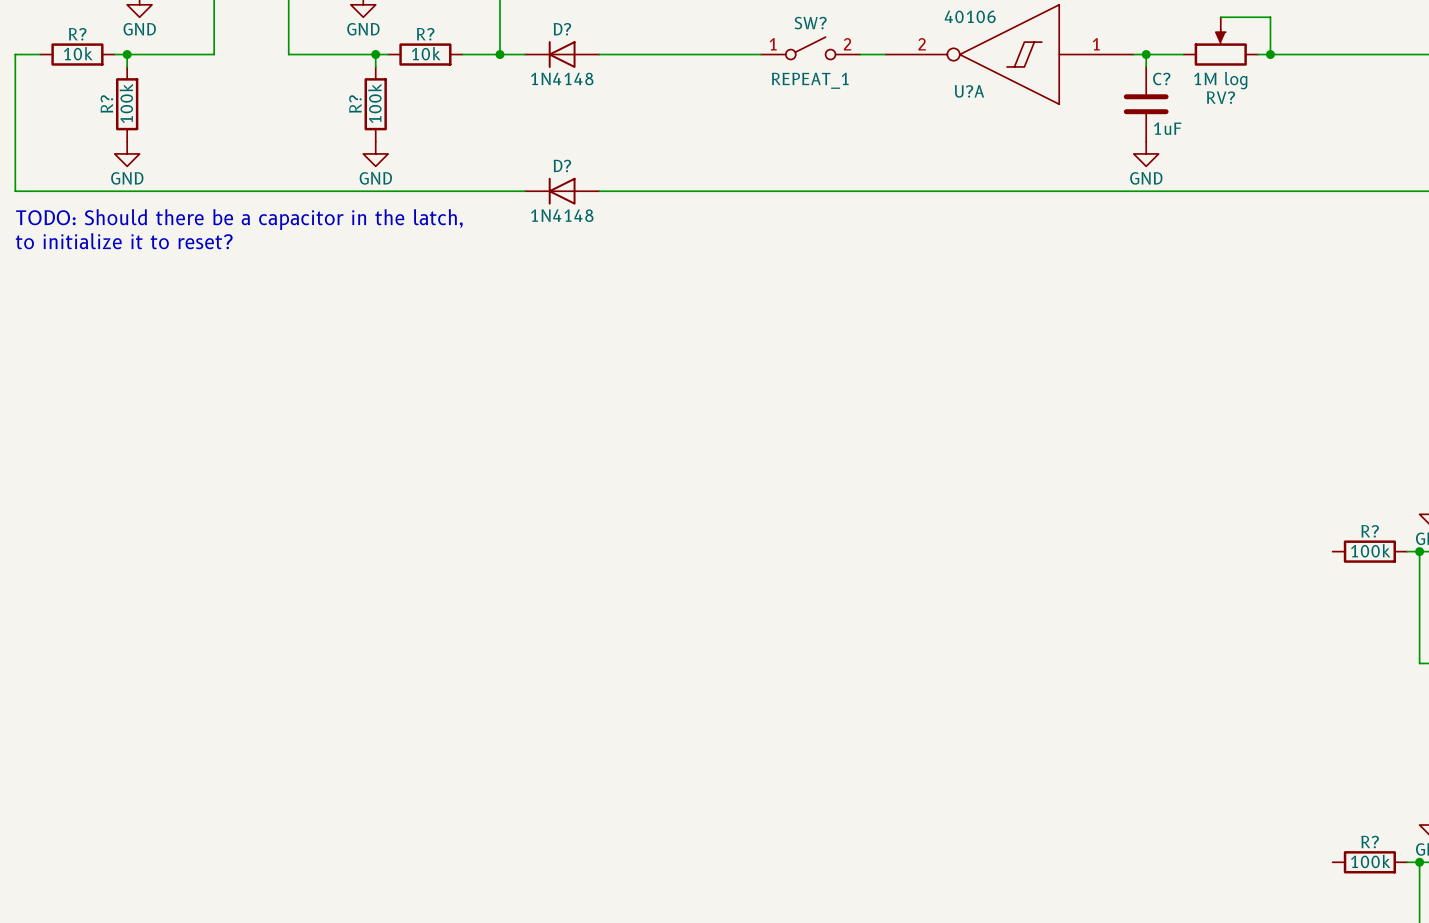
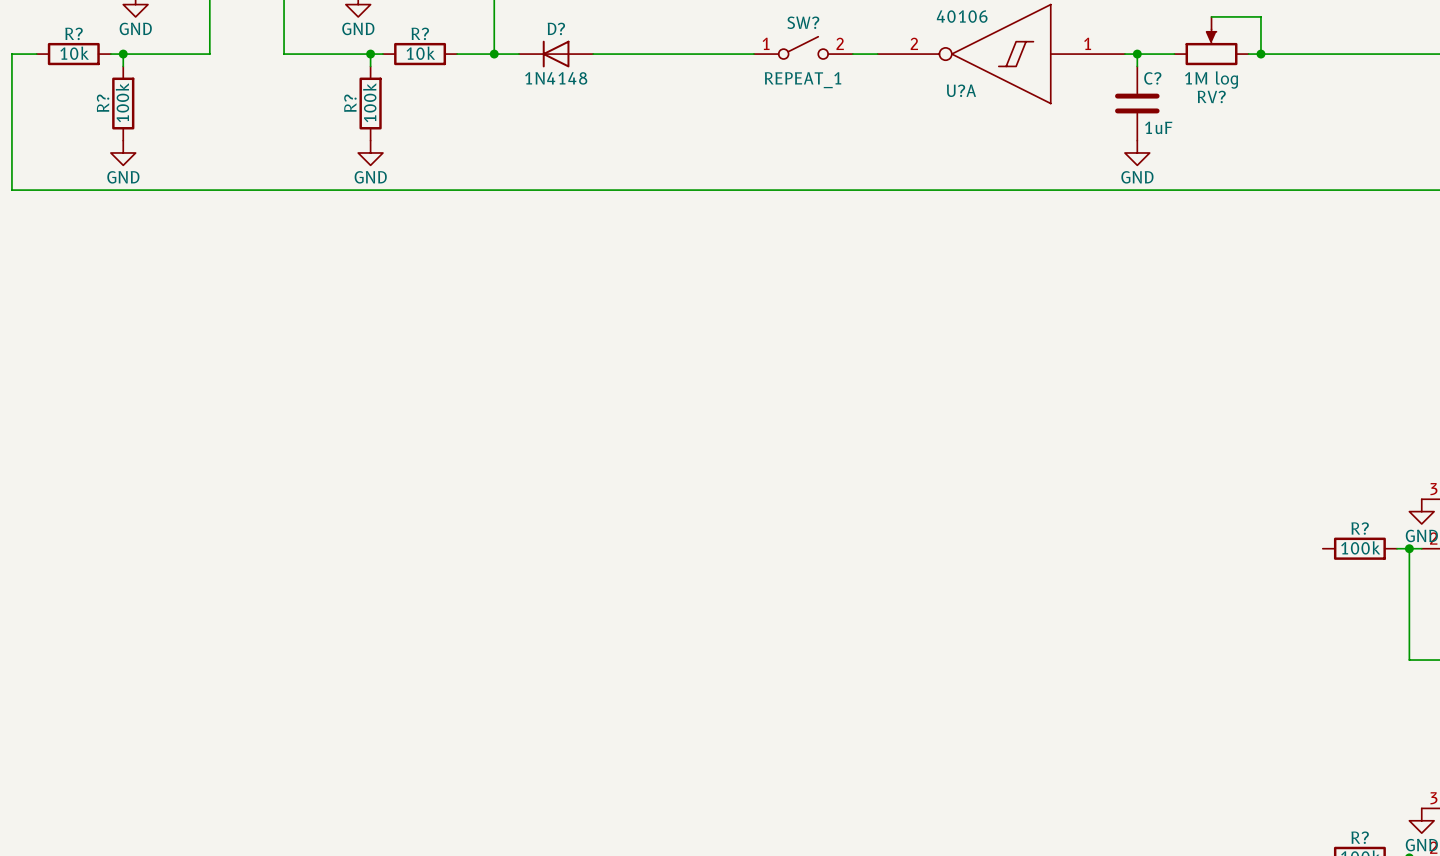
D?: 1N4148 (562, 191) -> none
text: TODO: Should there be a capacitor in the latch, (239, 219) -> none
text: to initialize it to reset? (124, 241) -> none

